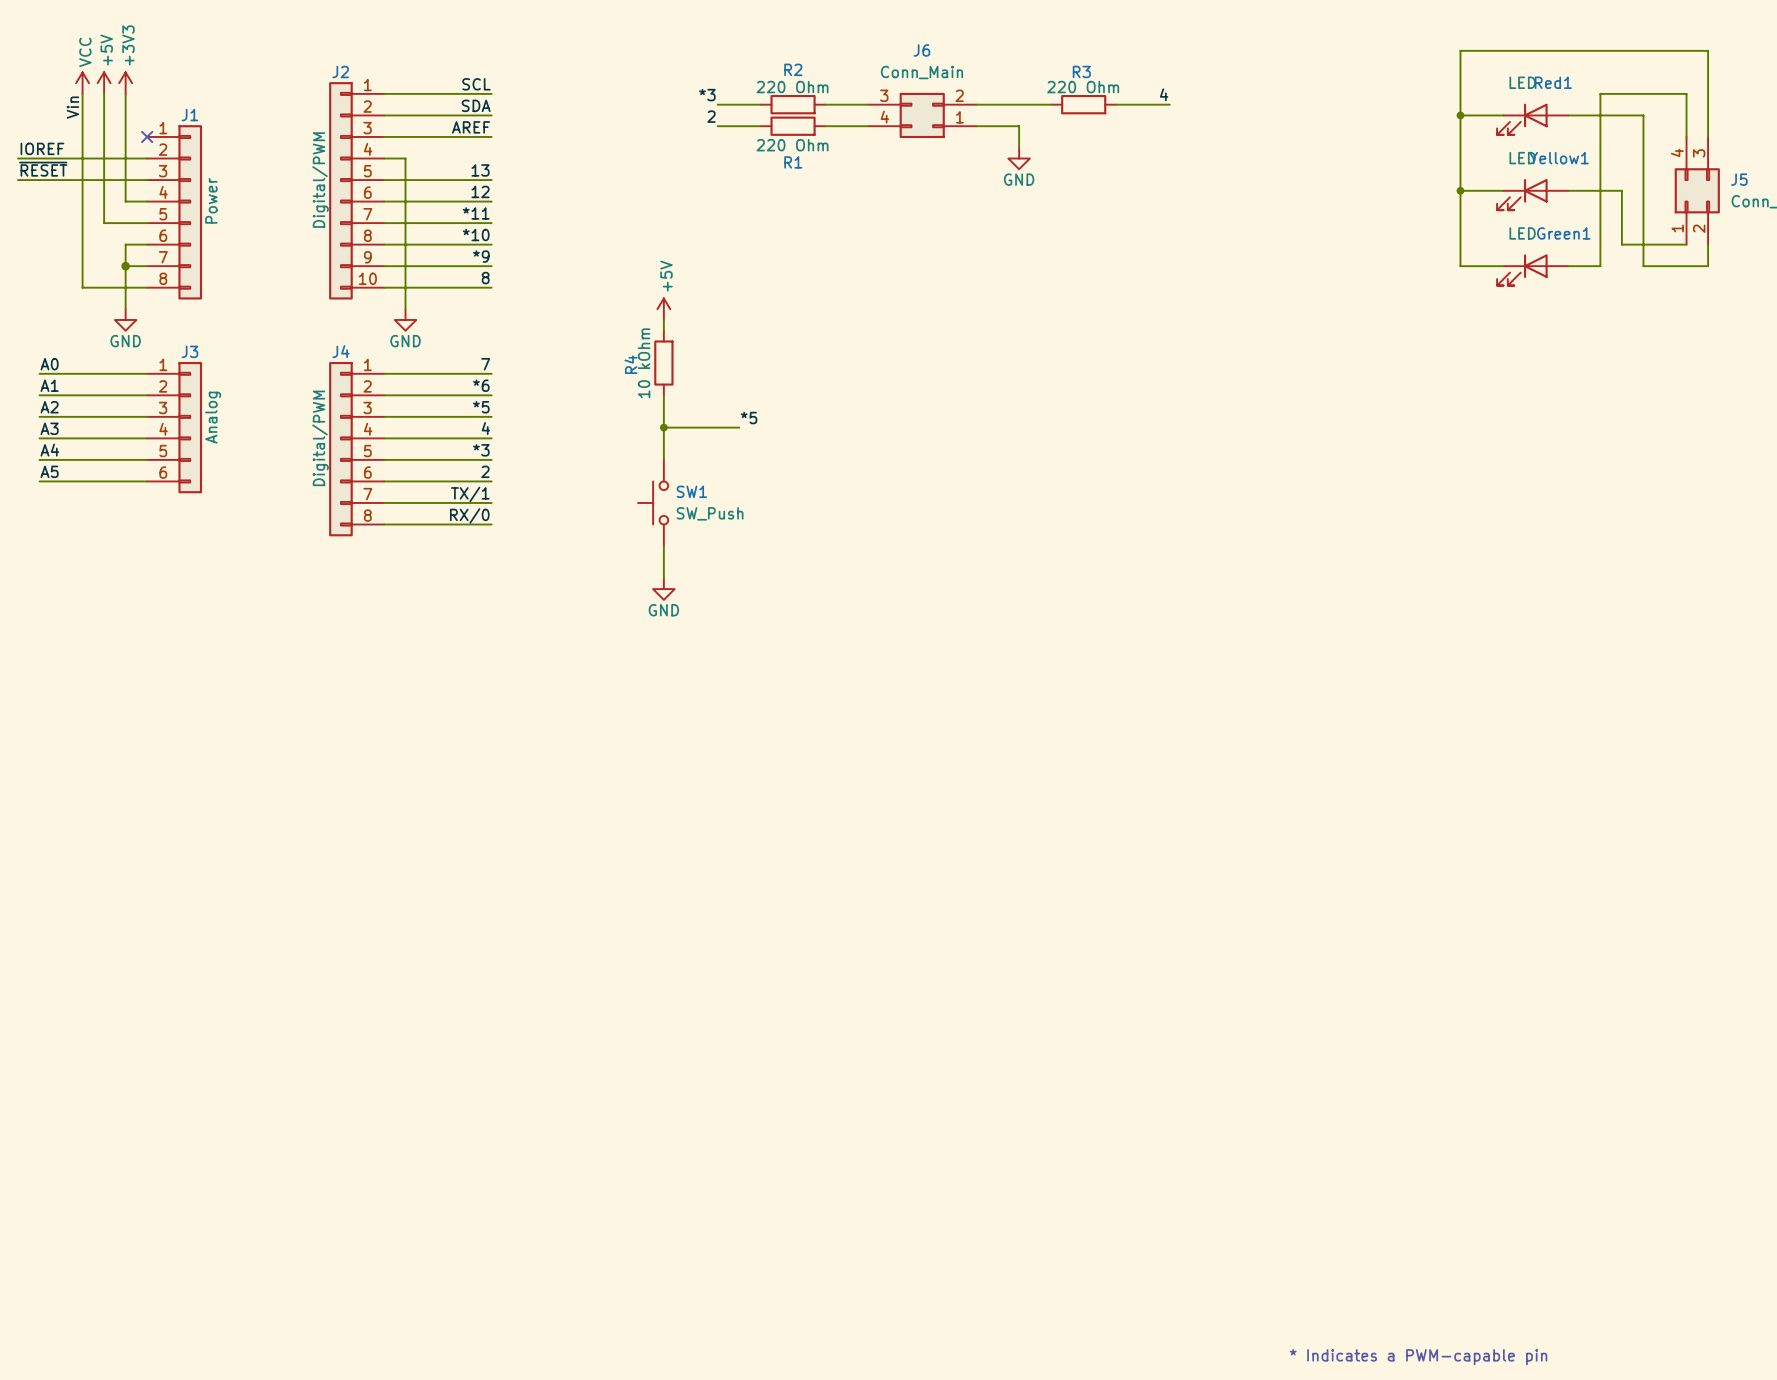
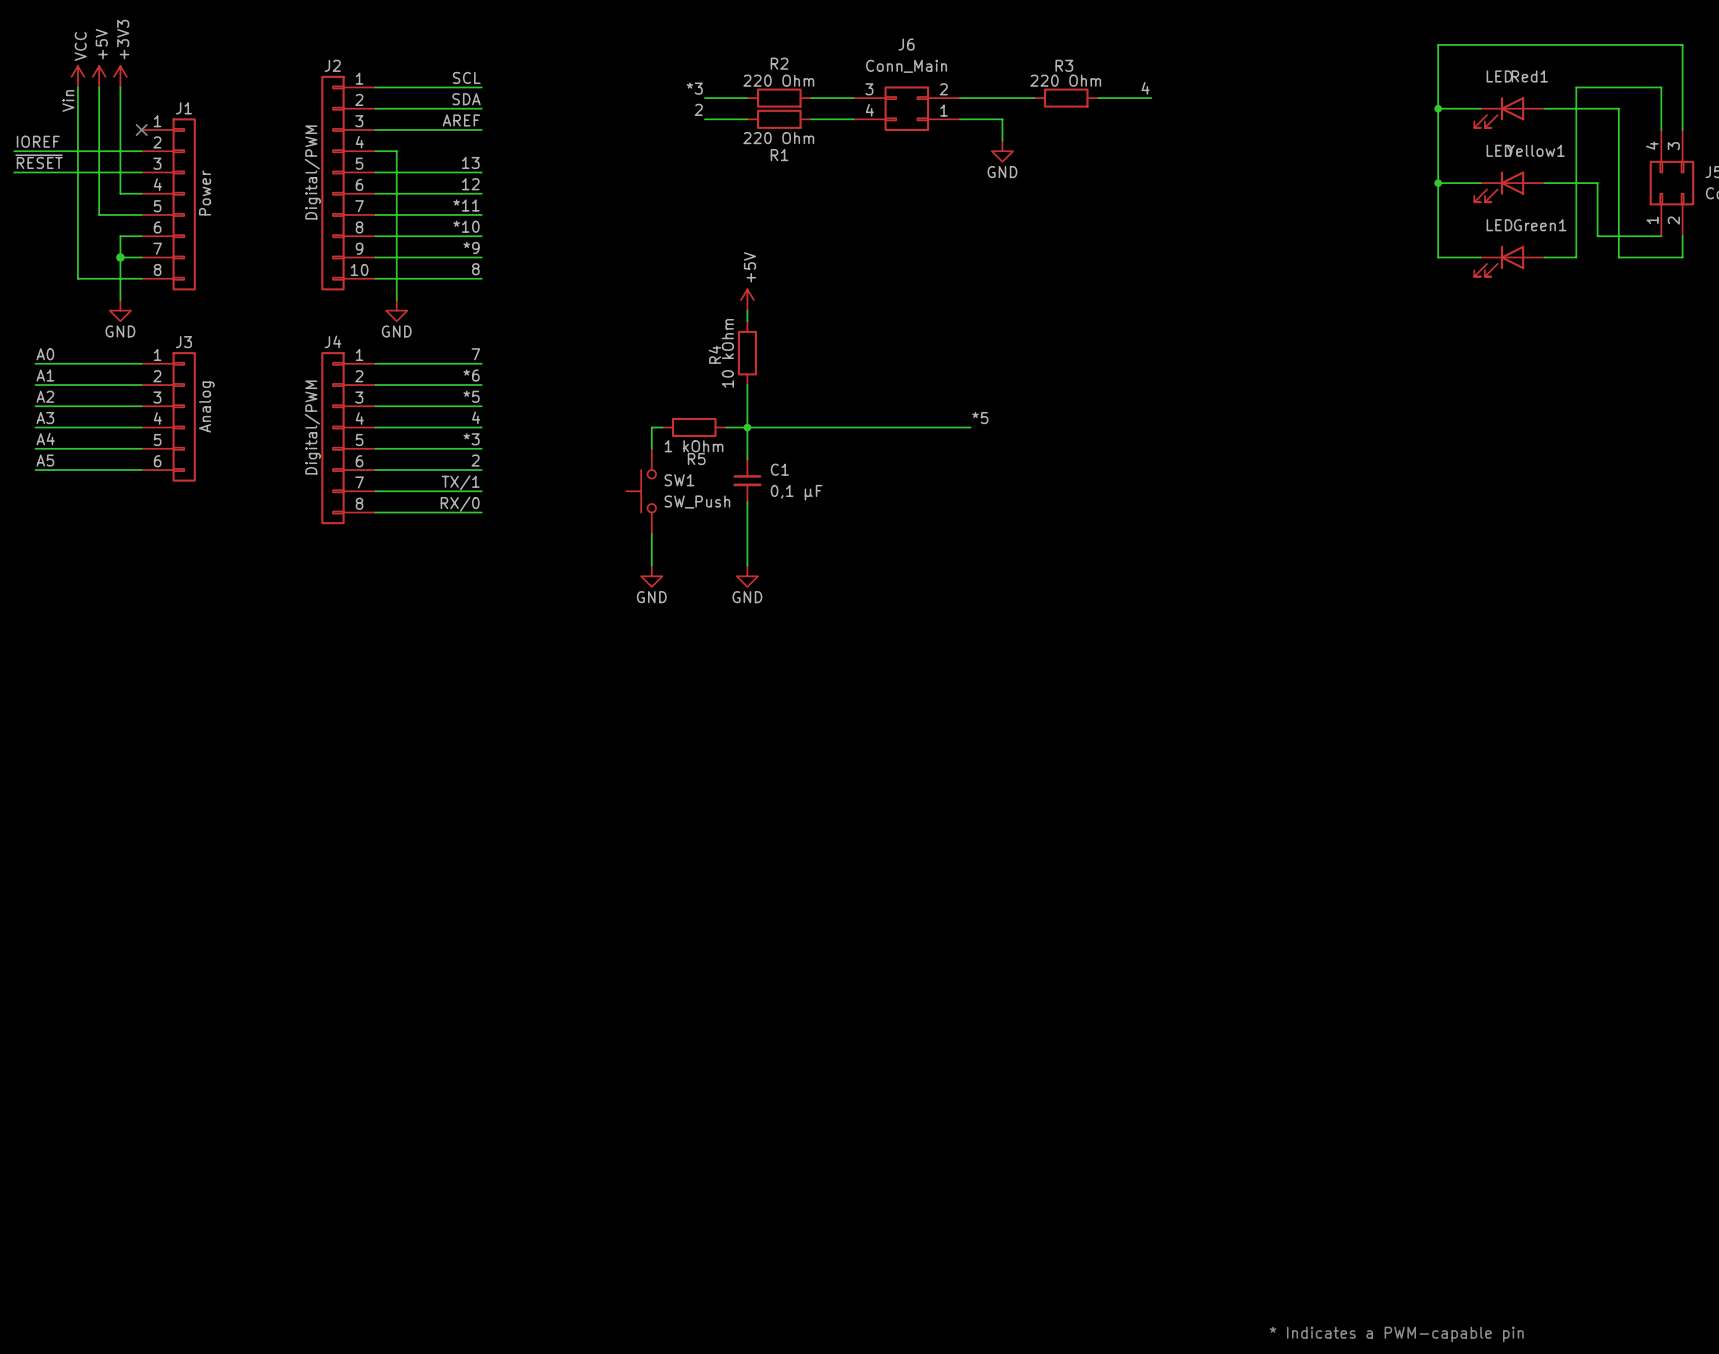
power symbol position: +5V (663, 309) -> +5V (747, 300)
wire: (663, 319) (663, 330) -> (747, 310) (747, 321)
R4 position: (663, 363) -> (747, 353)
wire: (663, 395) (663, 438) -> (662, 427) (651, 427)
wire: none -> (747, 385) (747, 459)
label: *5 (749, 418) -> none
wire: (663, 427) (739, 427) -> none
junction: (663, 427) -> none
label: none -> *5 (980, 418)
R5: none -> 1 kOhm (694, 427)
wire: none -> (726, 427) (970, 427)
junction: none -> (747, 427)
C1: none -> 0,1 µF (747, 480)
wire: none -> (747, 501) (747, 565)
power symbol: none -> GND (747, 576)

